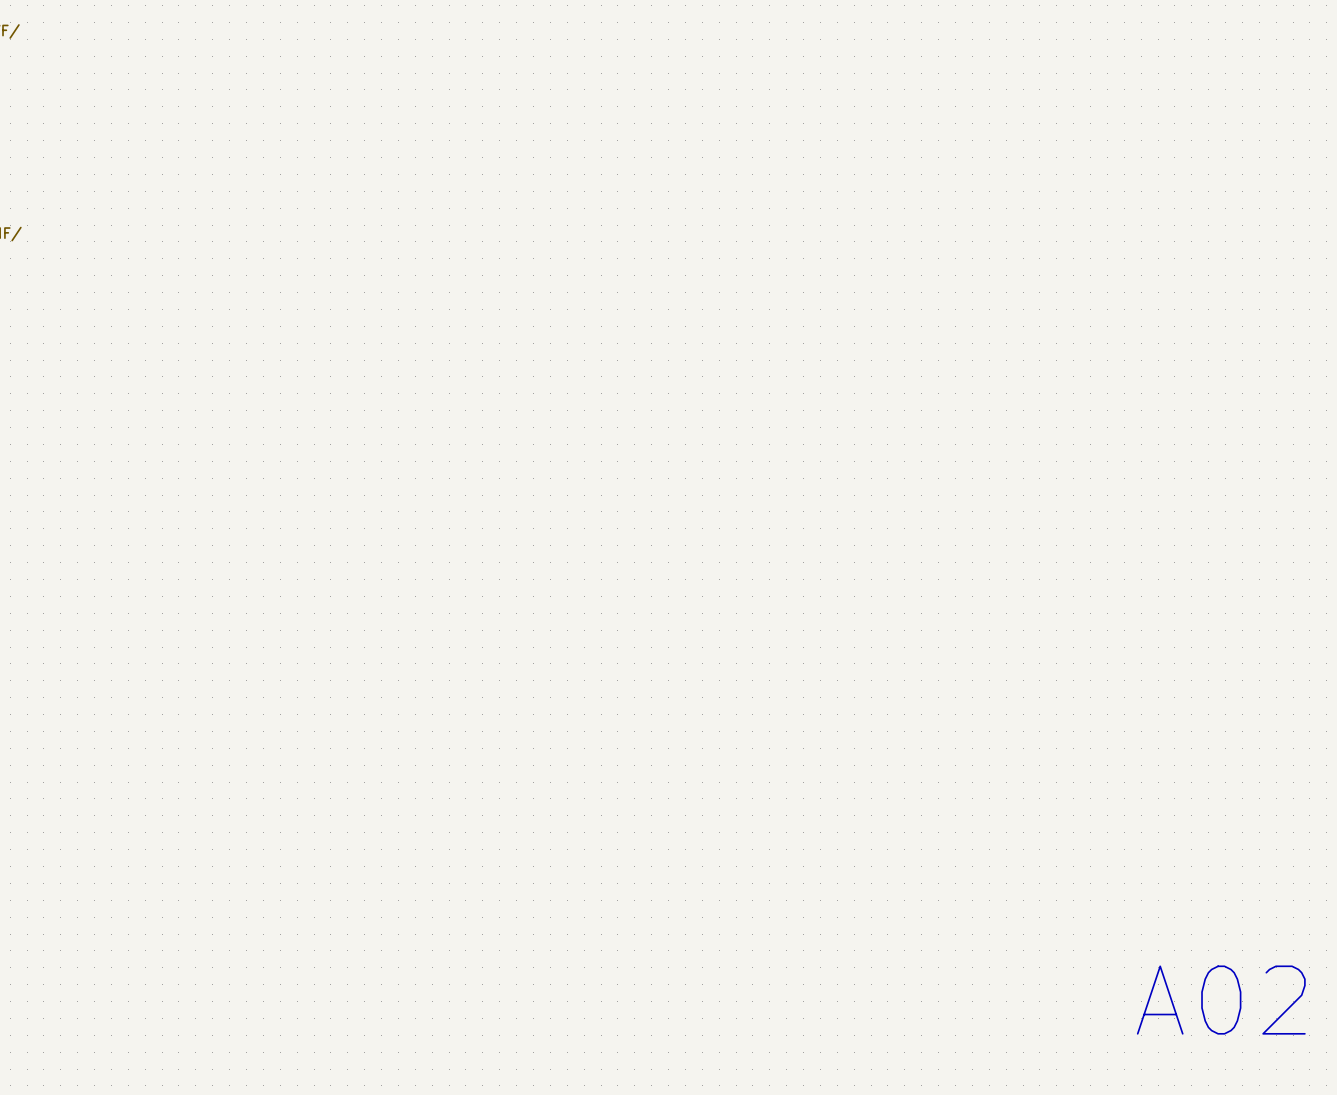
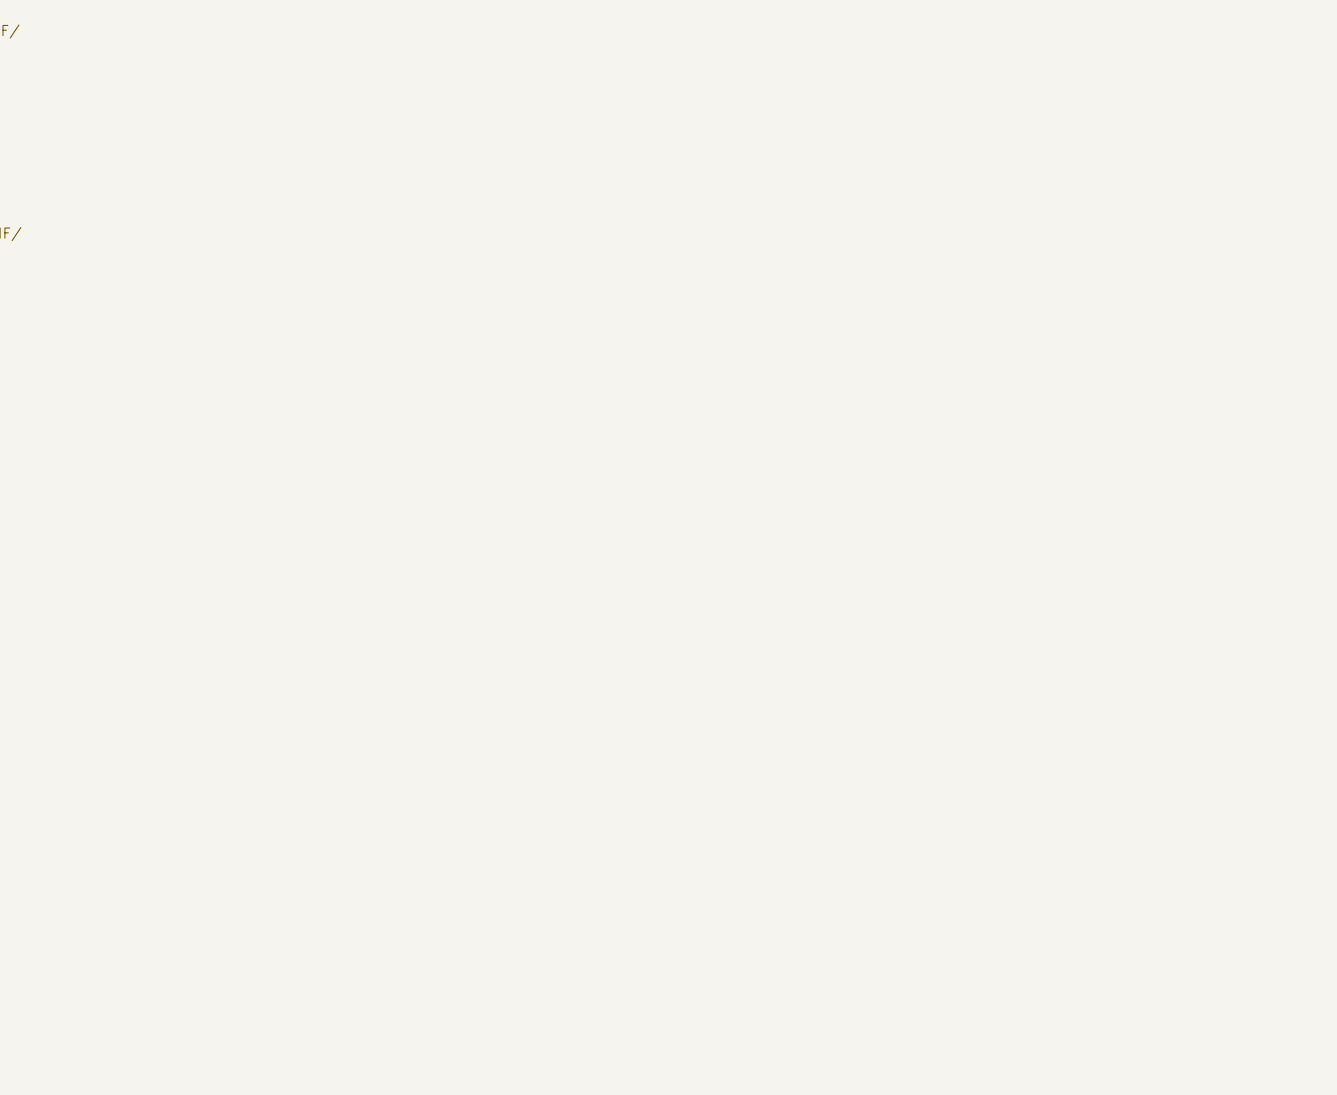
text: A02 (1221, 1000) -> none

